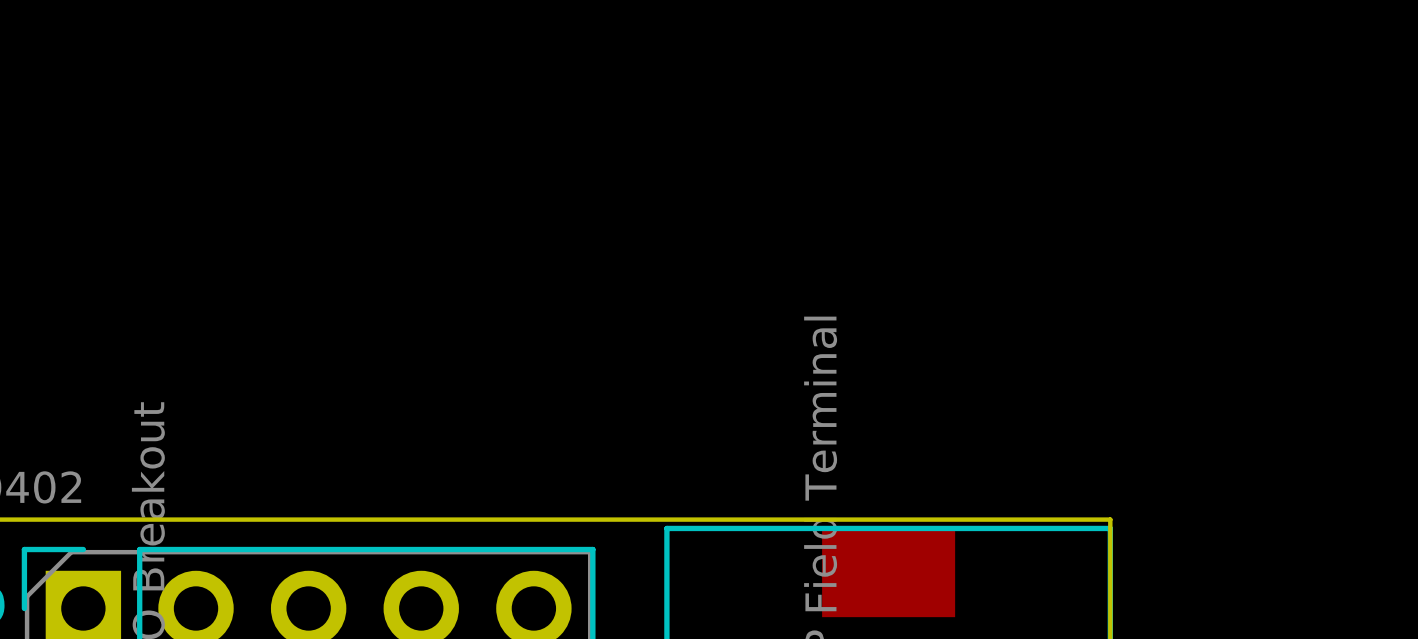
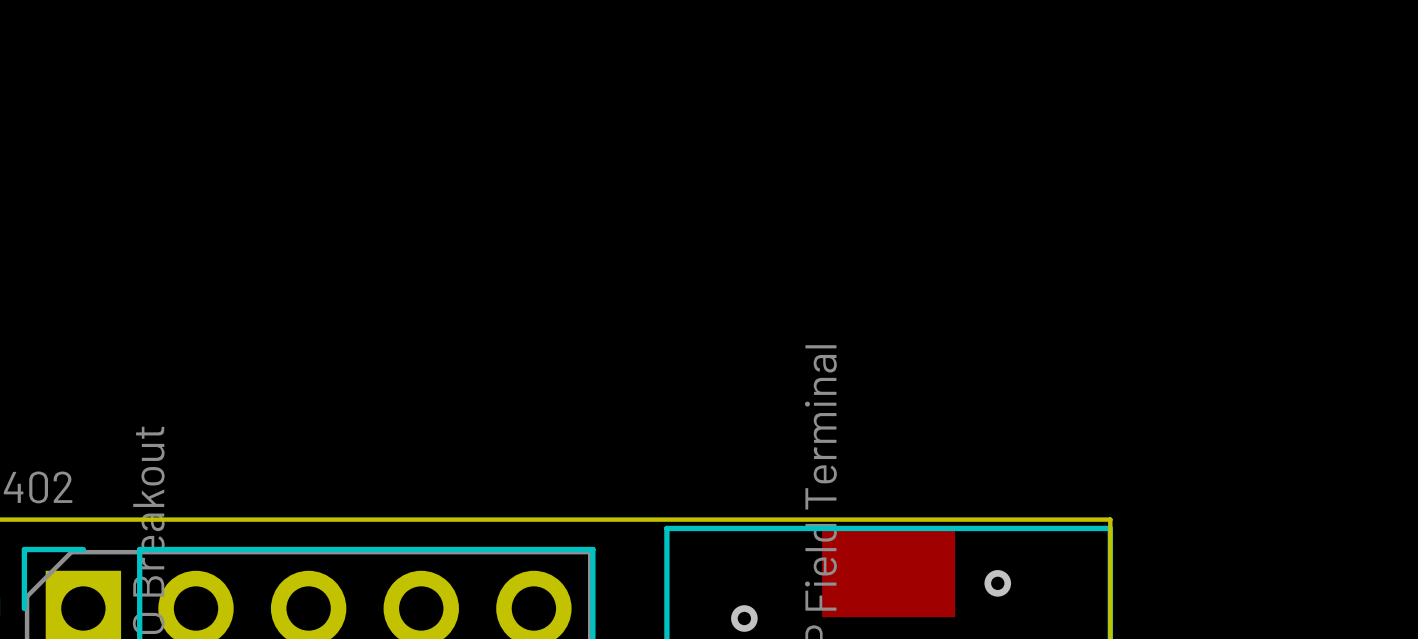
via: none -> (997, 583)
via: none -> (744, 618)

